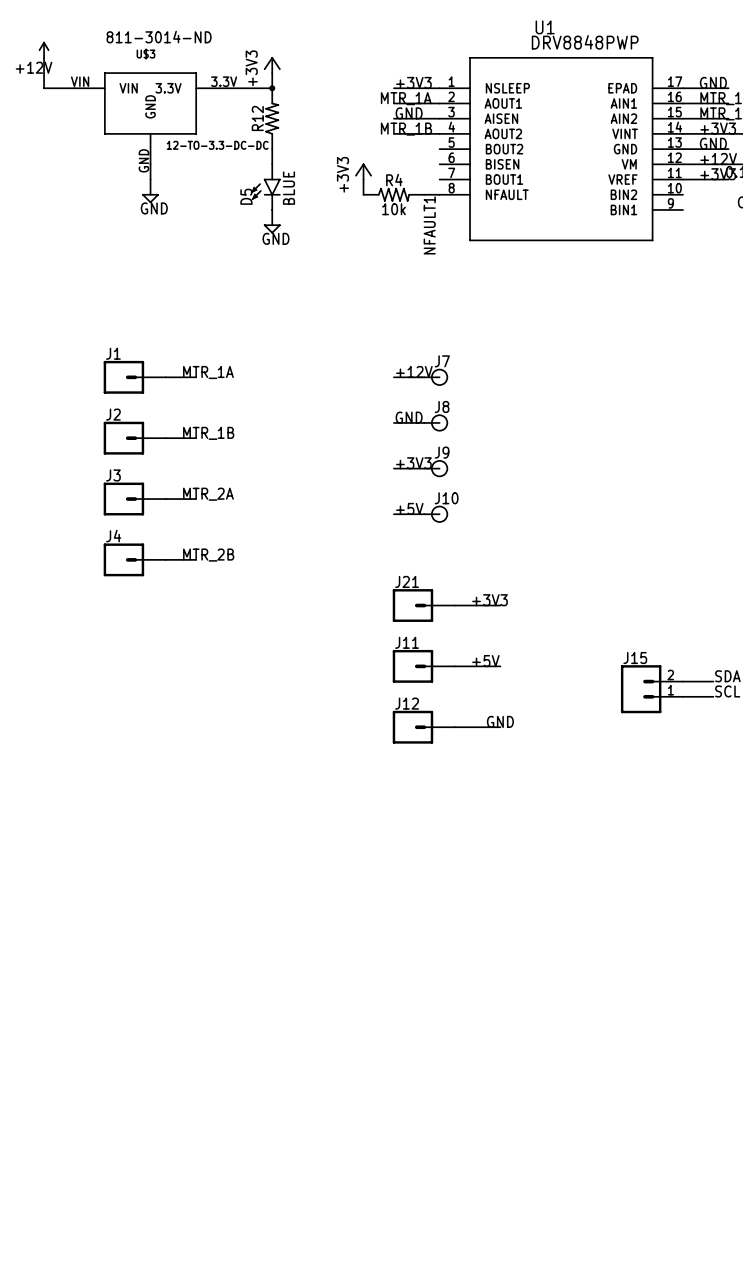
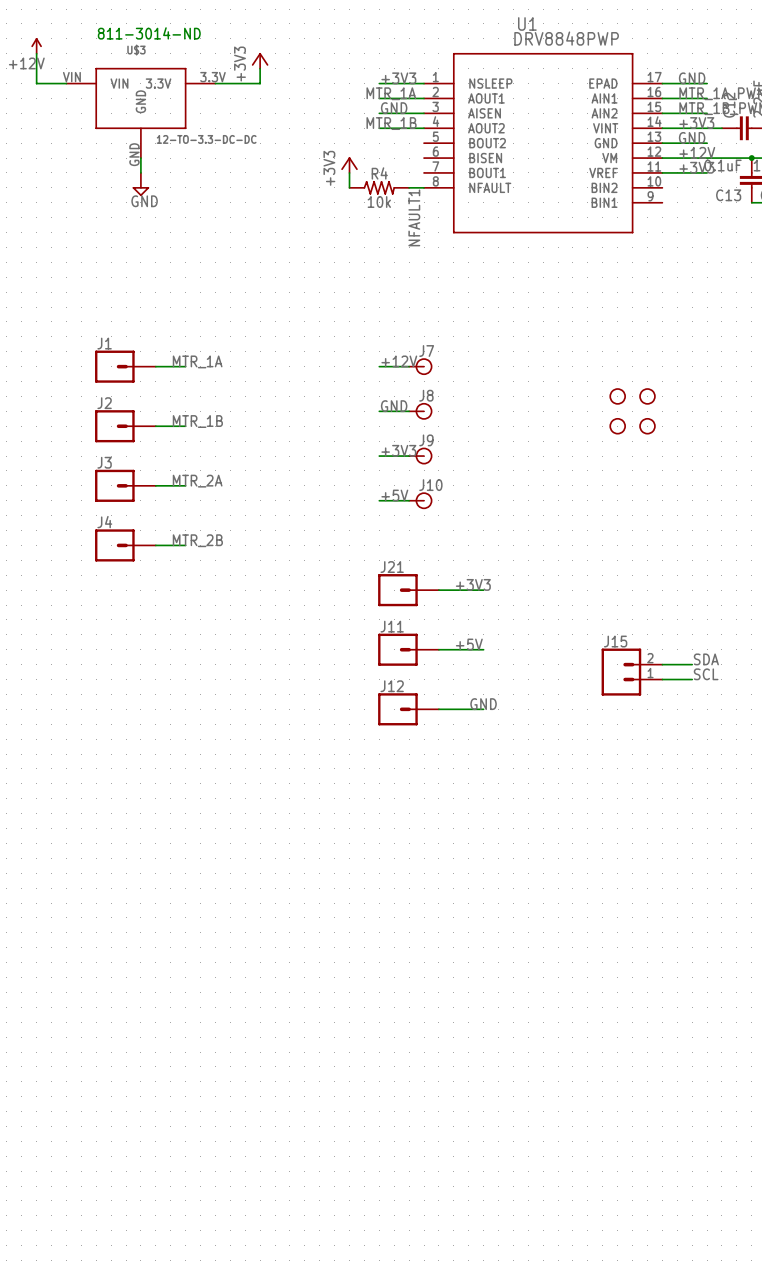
junction: (272, 88) -> none
R12: (272, 118) -> none
wire: (272, 149) (272, 164) -> none
D5: BLUE (265, 187) -> none
power symbol: GND (272, 221) -> none
part: none -> (617, 396)
part: none -> (647, 396)
part: none -> (617, 426)
part: none -> (647, 426)

